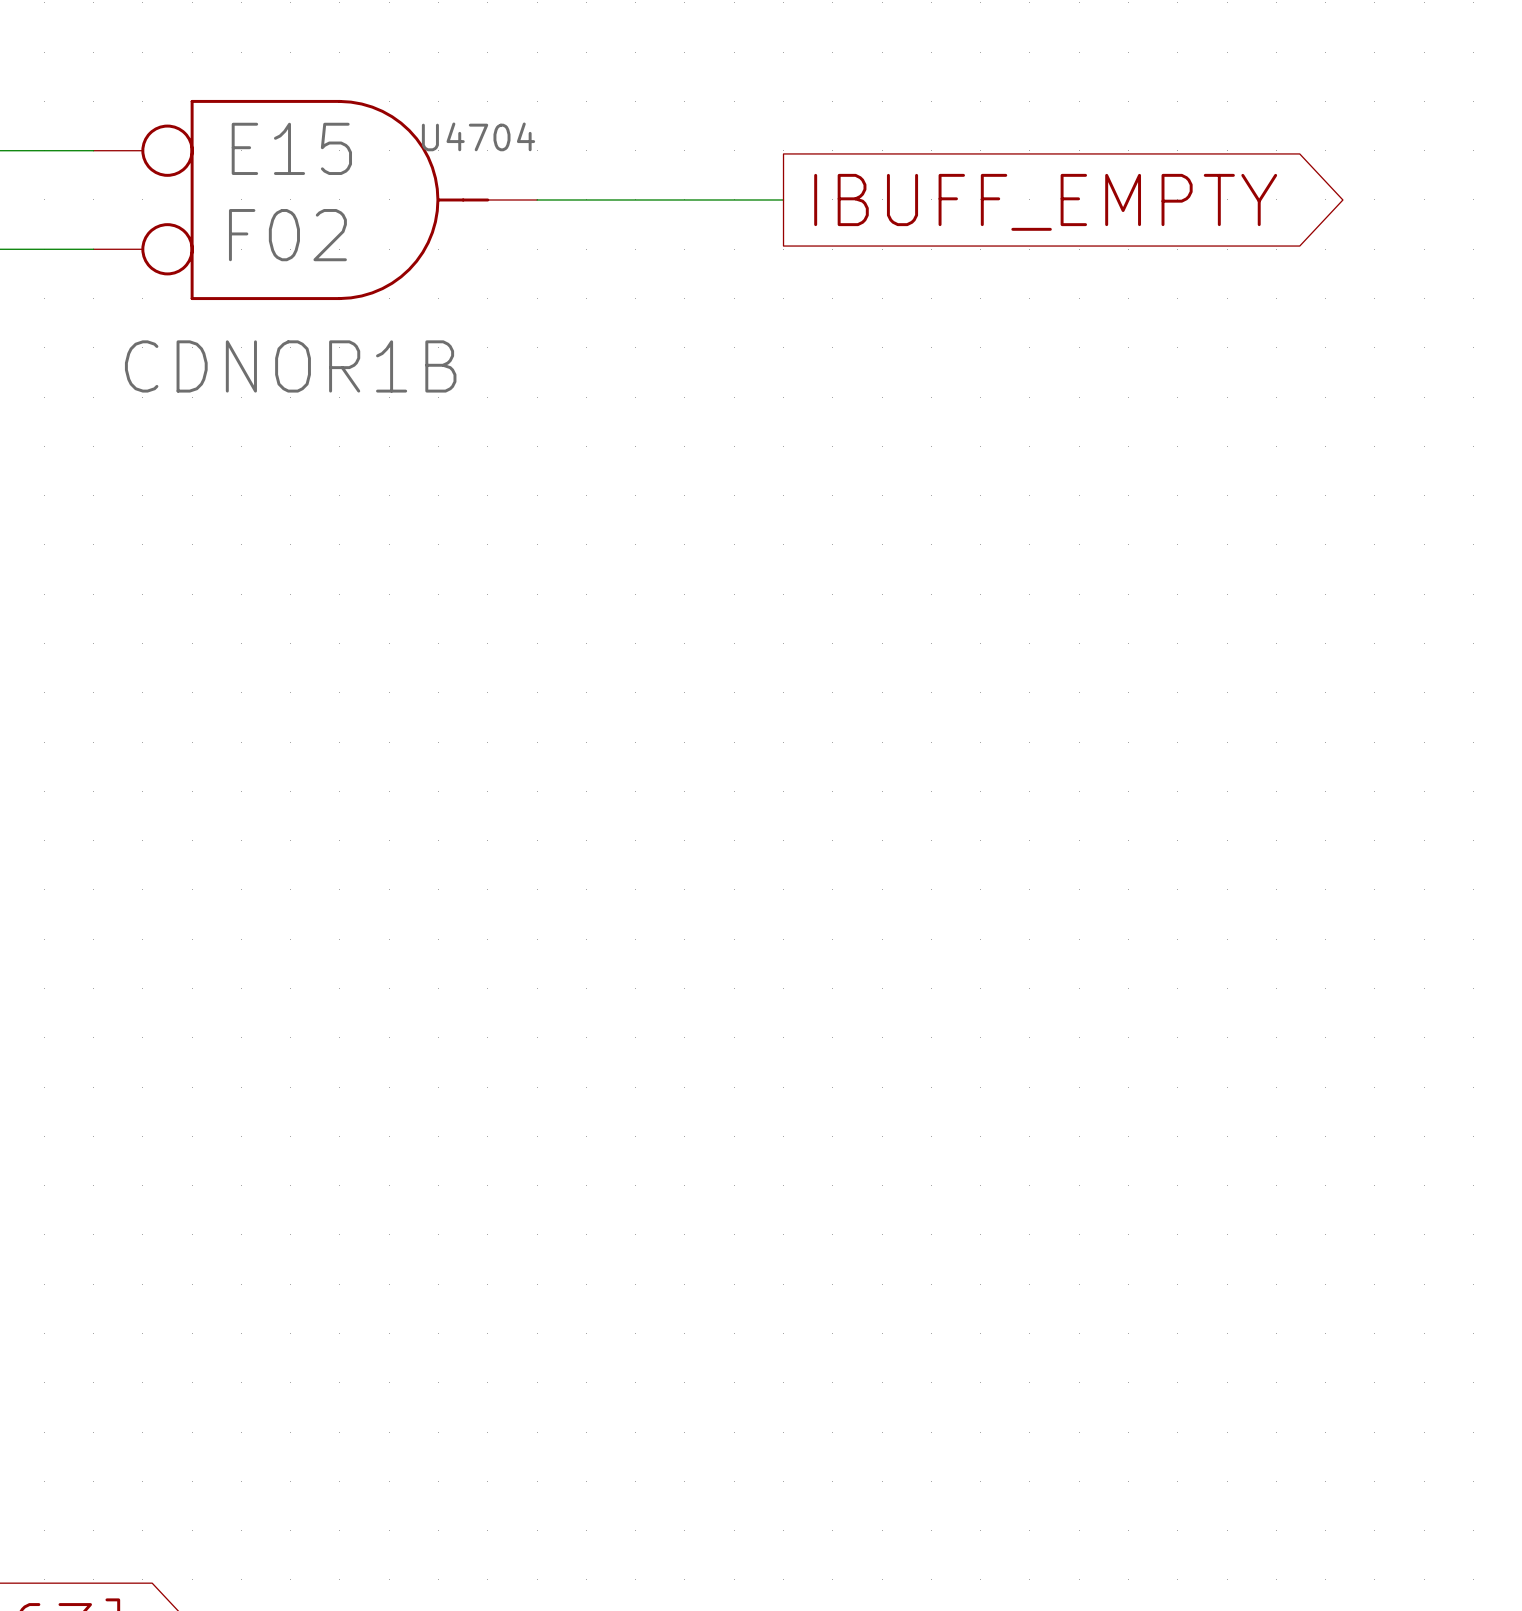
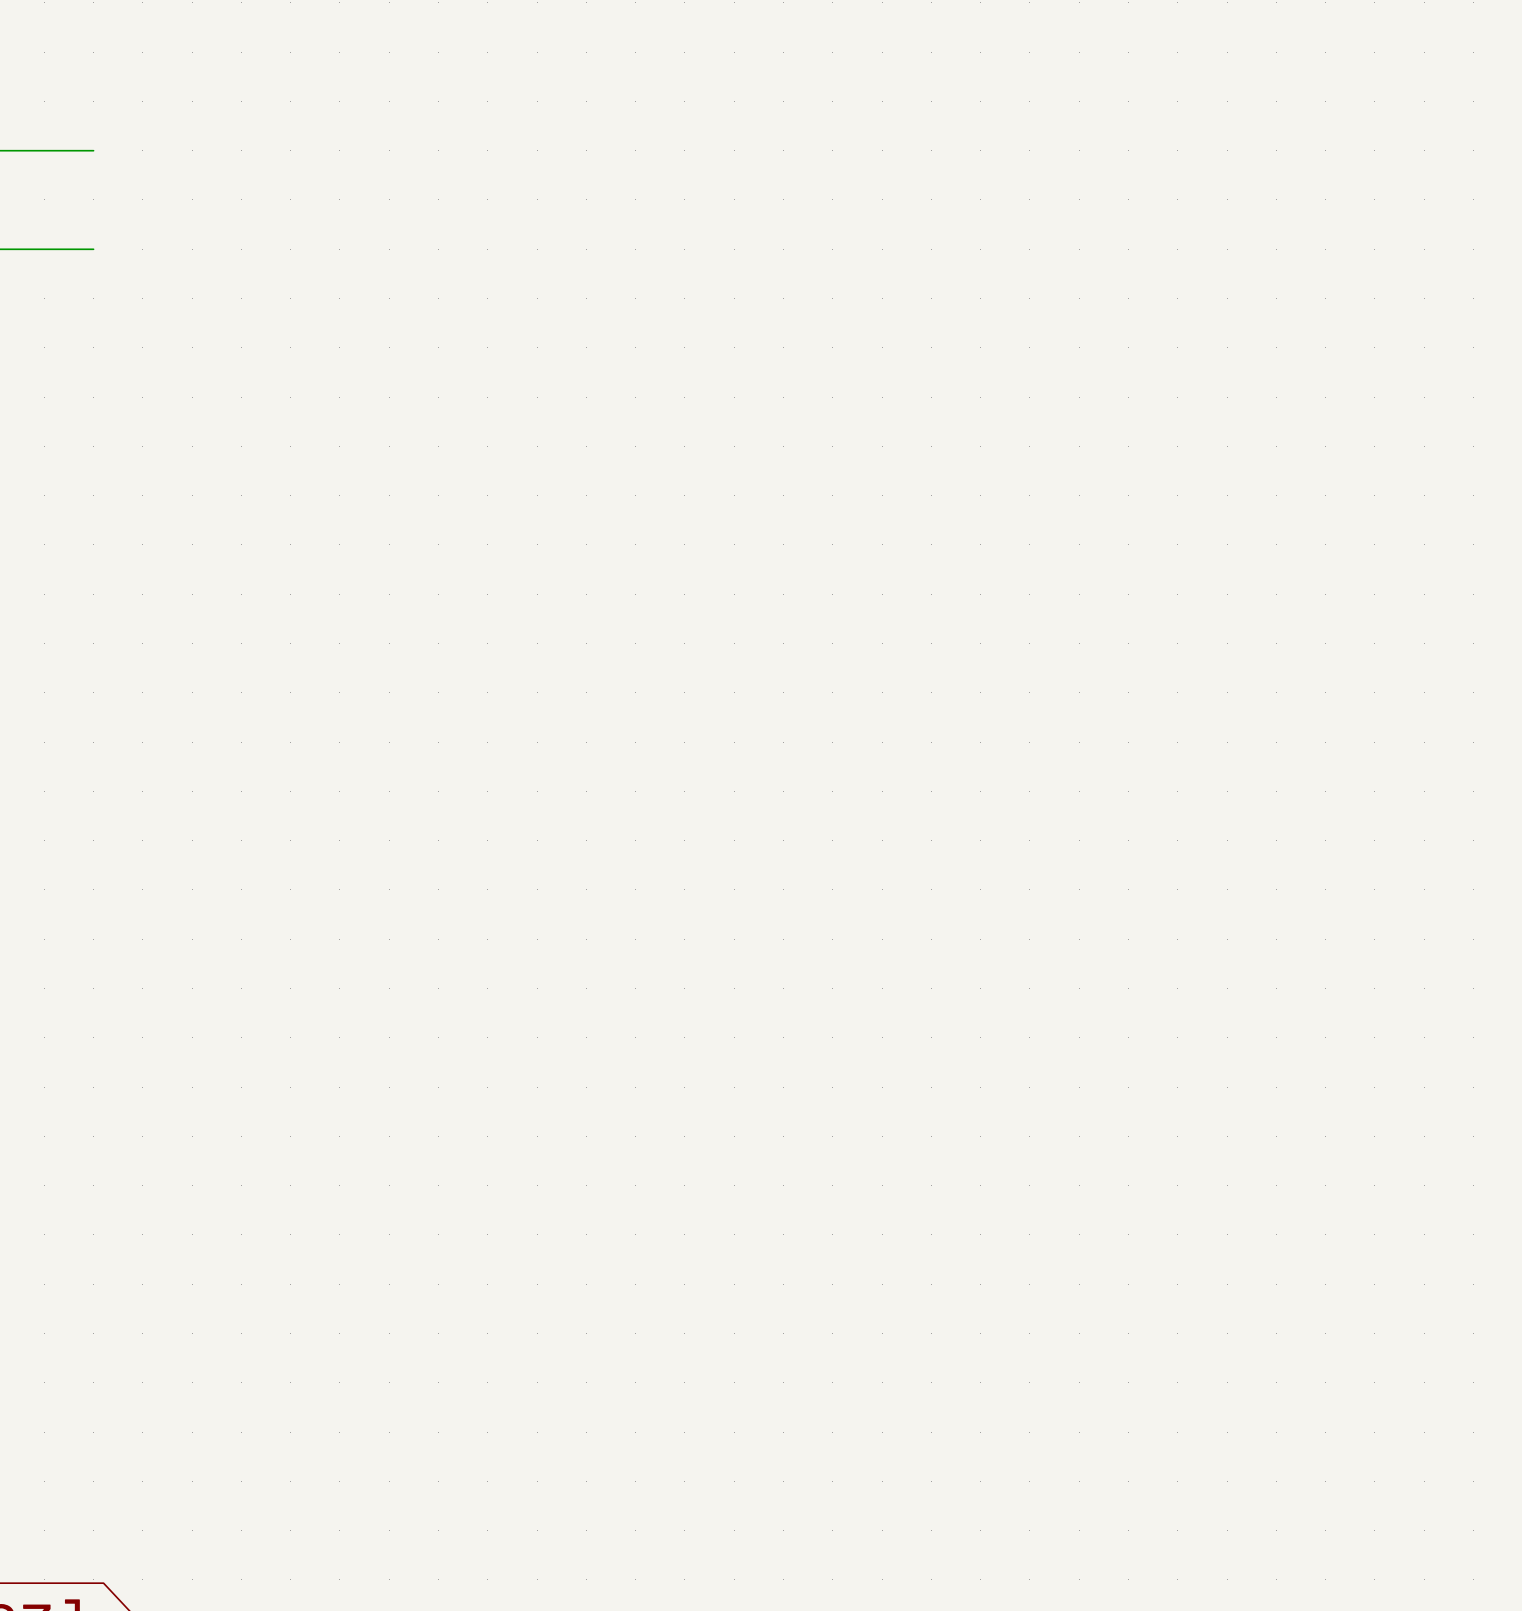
U4704: F02 (315, 199) -> none
wire: (537, 199) (783, 199) -> none
global label: IBUFF_EMPTY (1045, 202) -> none

